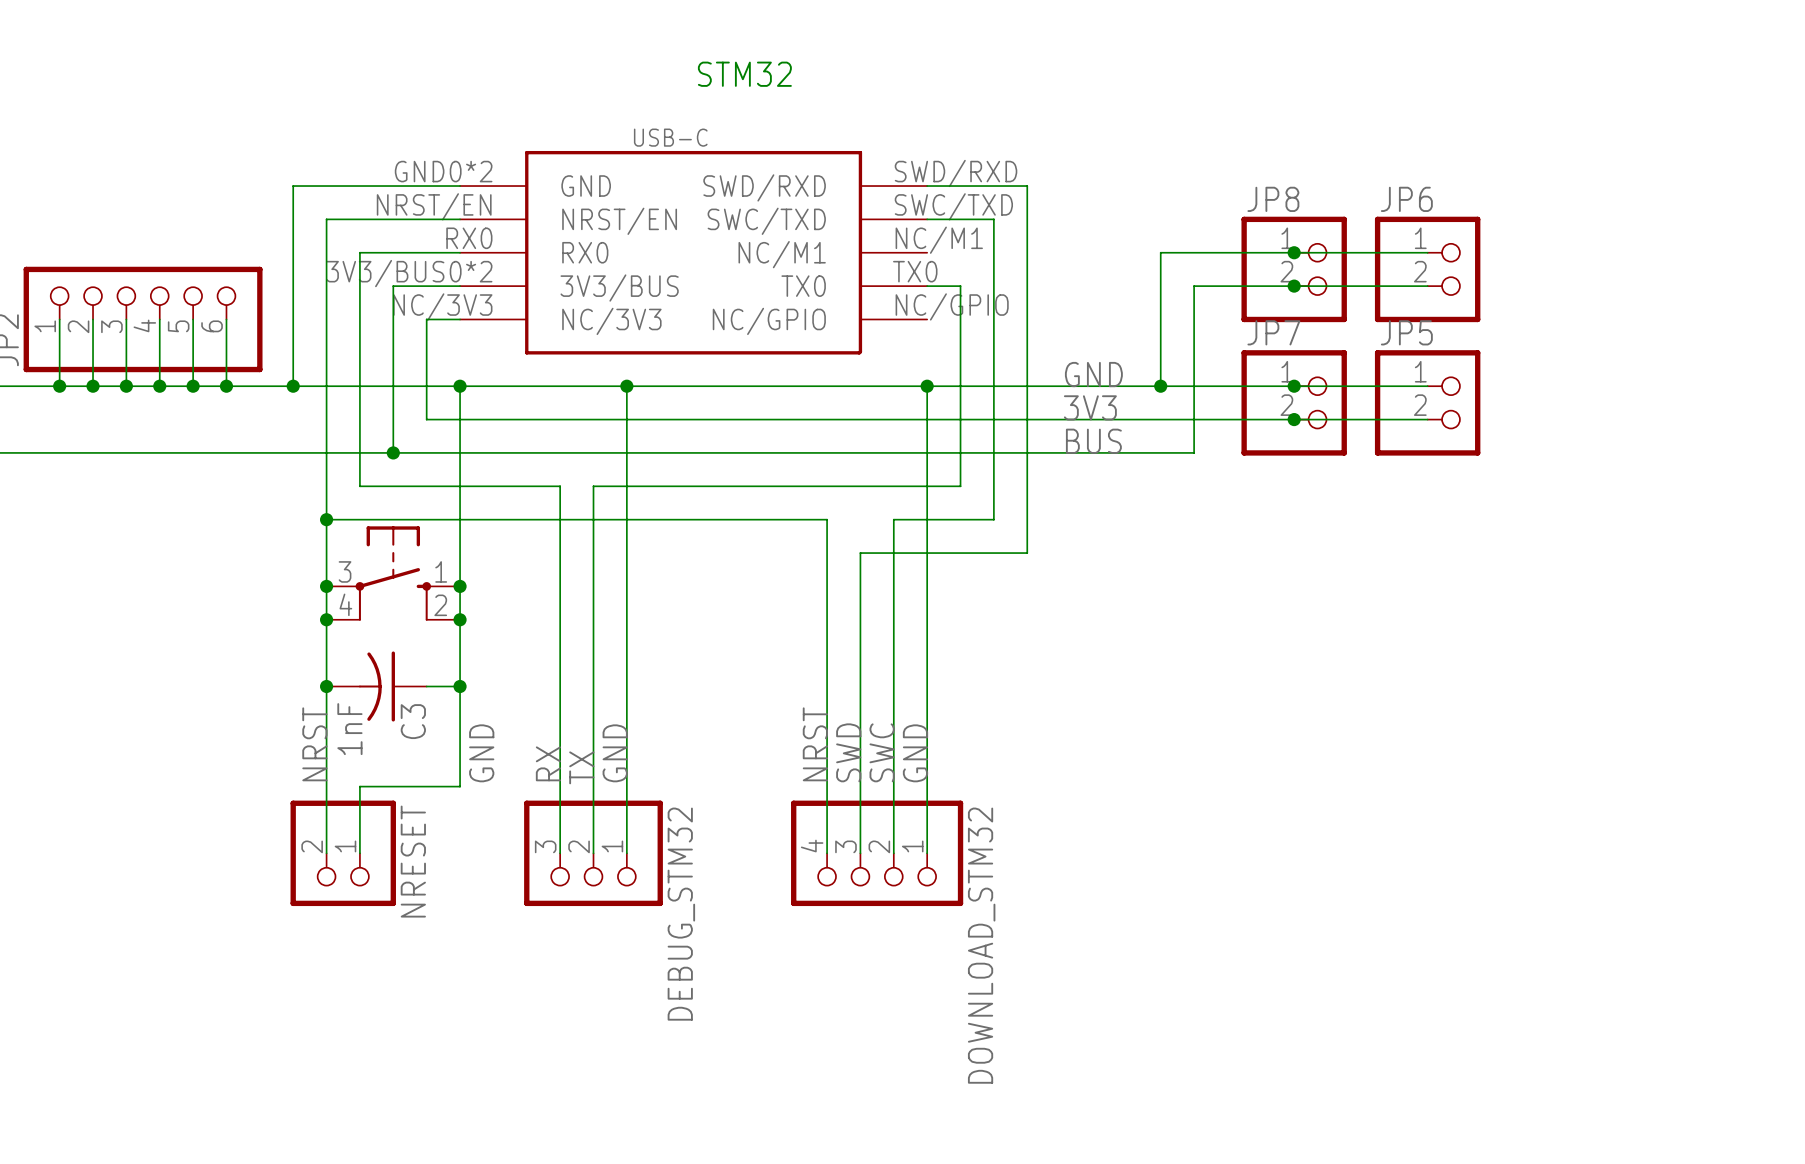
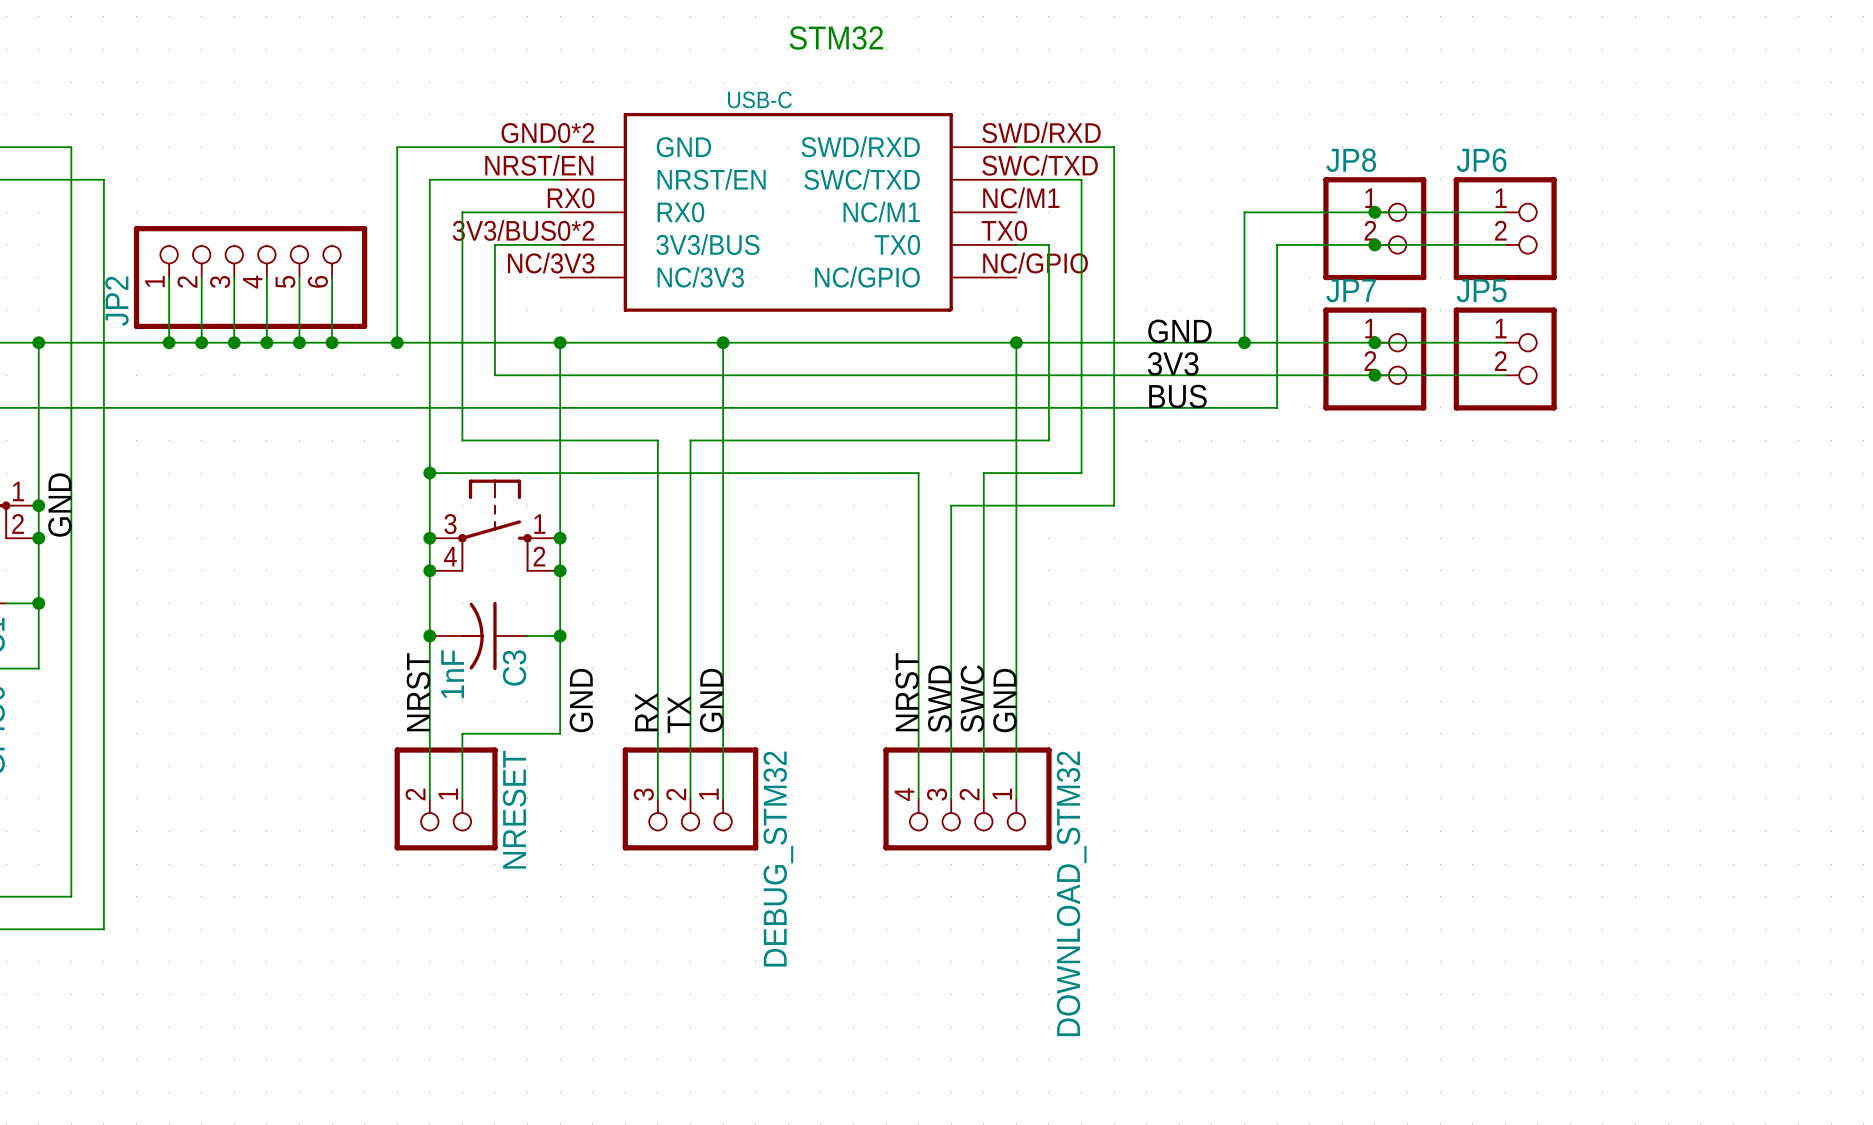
wire: (460, 319) (426, 319) (426, 419) -> none
wire: (393, 419) (393, 452) -> (494, 375) (527, 375)
junction: (393, 452) -> none

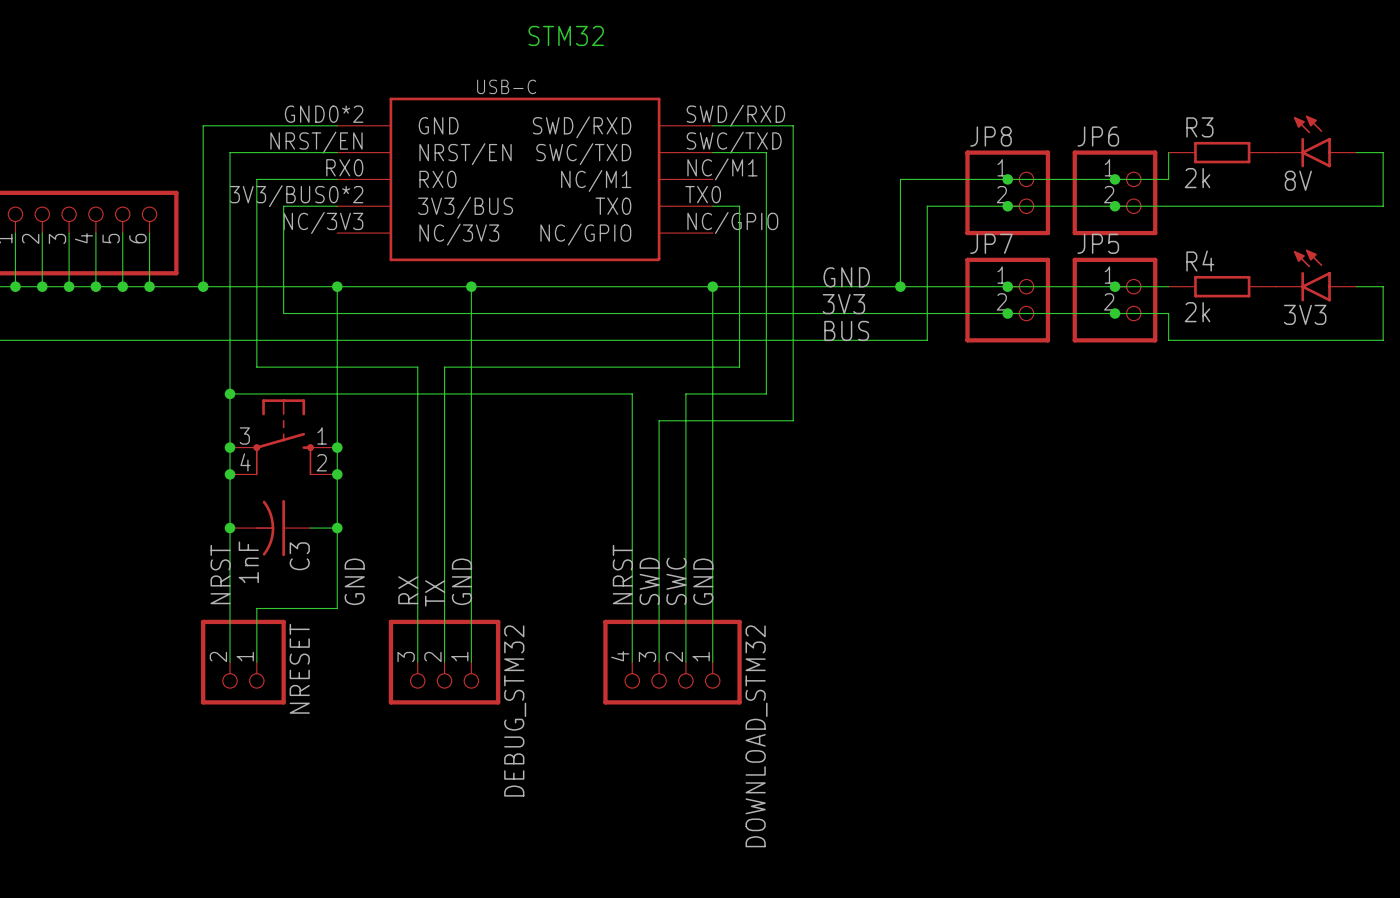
8V: none -> (1316, 141)
wire: none -> (1168, 152) (1168, 179) (1114, 179)
R3: none -> 2k (1222, 152)
wire: none -> (1356, 152) (1383, 152) (1383, 206) (1114, 206)
junction: none -> (1114, 179)
junction: none -> (1114, 206)
3V3: none -> (1316, 275)
wire: none -> (1114, 286) (1168, 286)
junction: none -> (1114, 286)
R4: none -> 2k (1222, 286)
wire: none -> (1356, 286) (1383, 286) (1383, 340) (1168, 340) (1168, 313) (1114, 313)
junction: none -> (1114, 313)

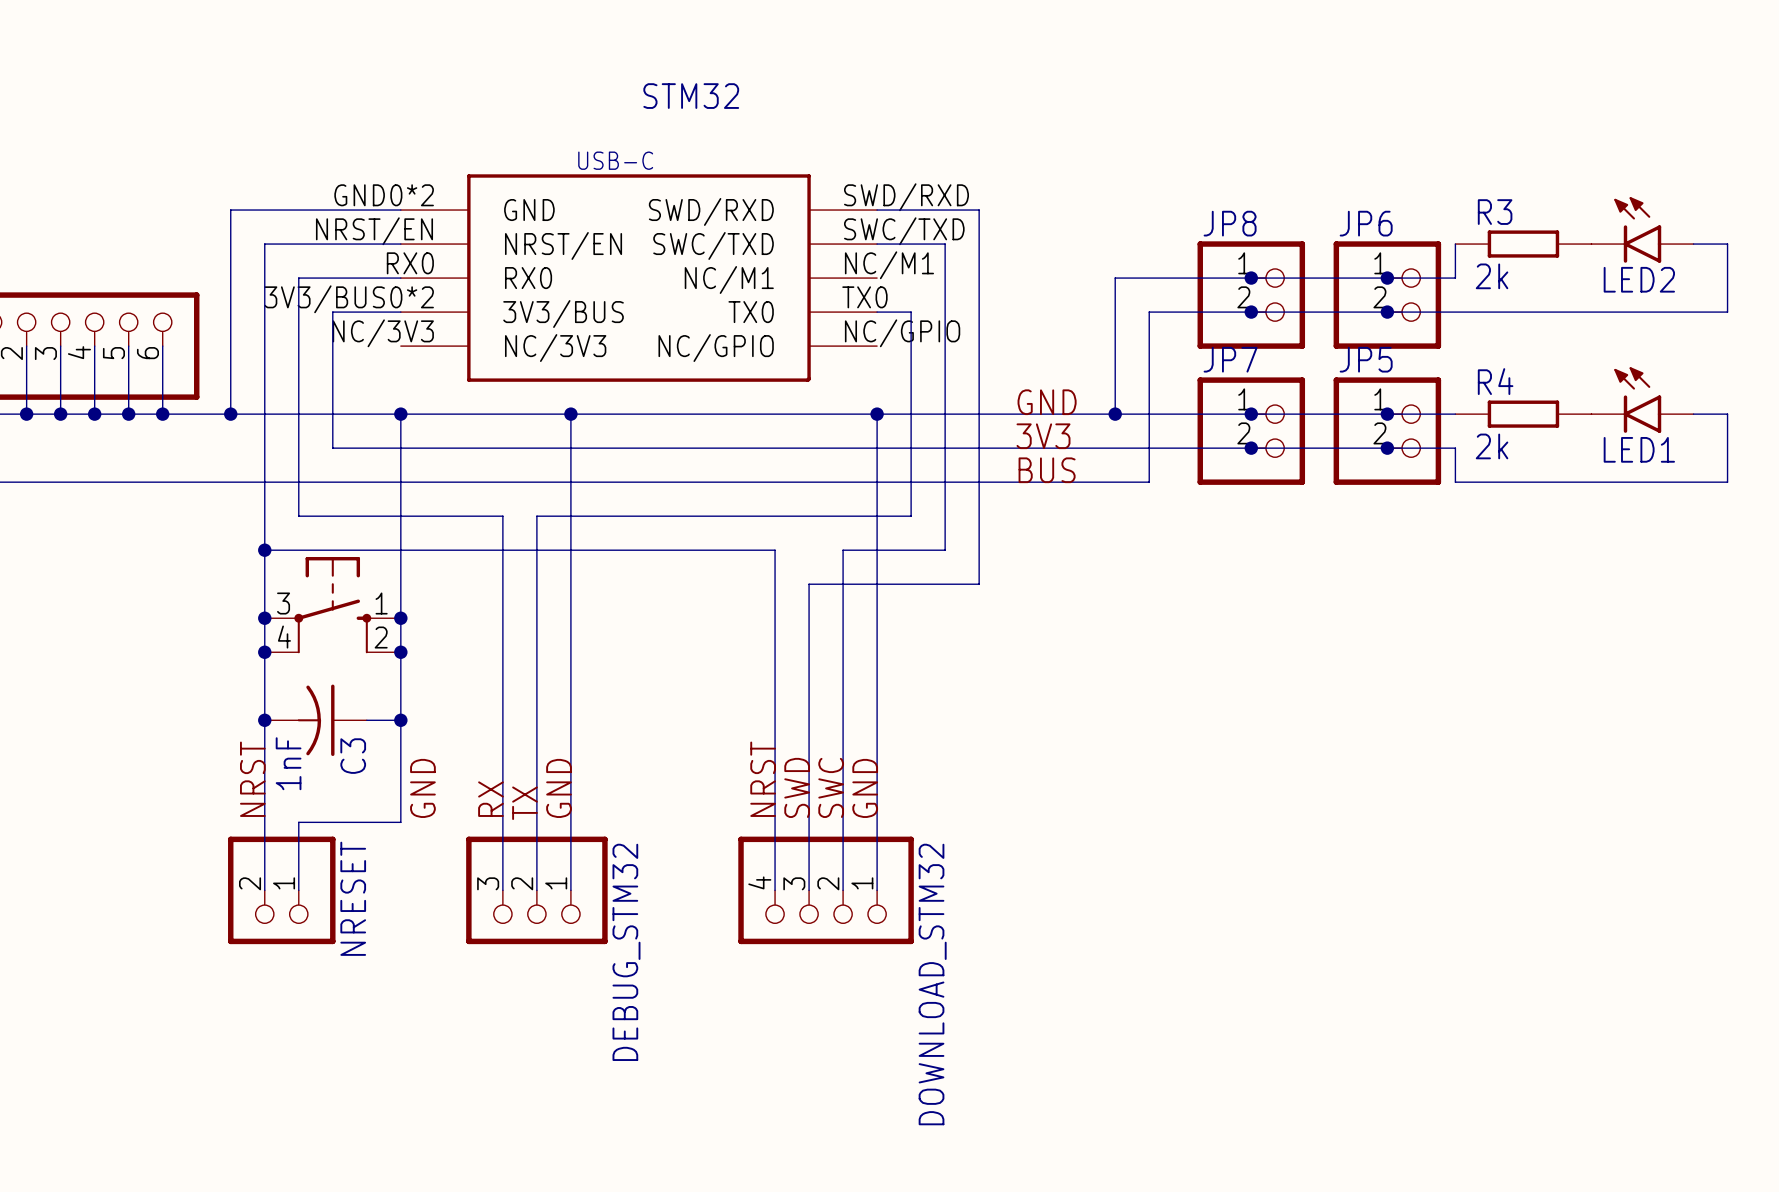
8V name: 8V (1298, 180) -> LED2 (1639, 279)
3V3 name: 3V3 (1305, 314) -> LED1 (1639, 449)

